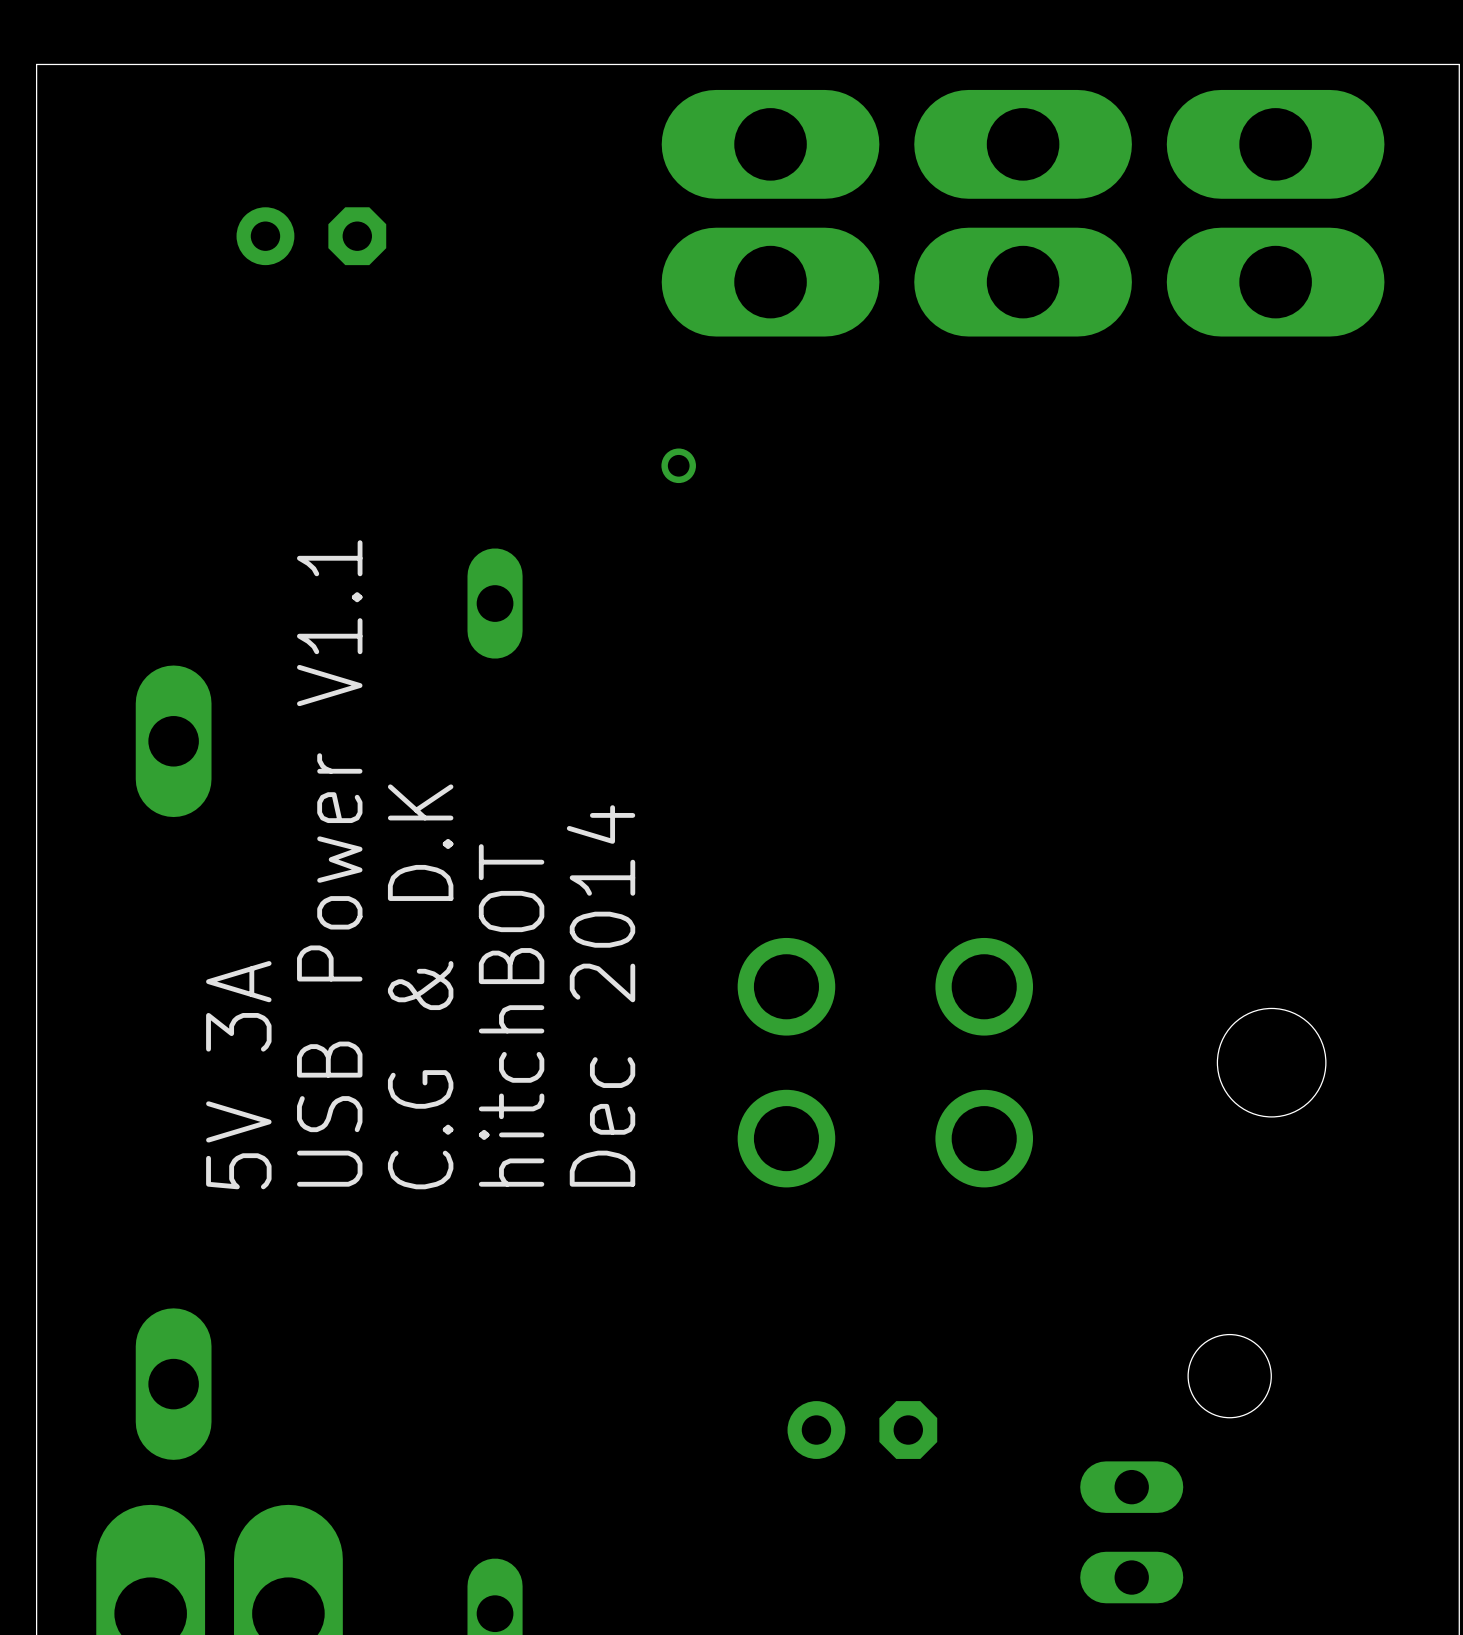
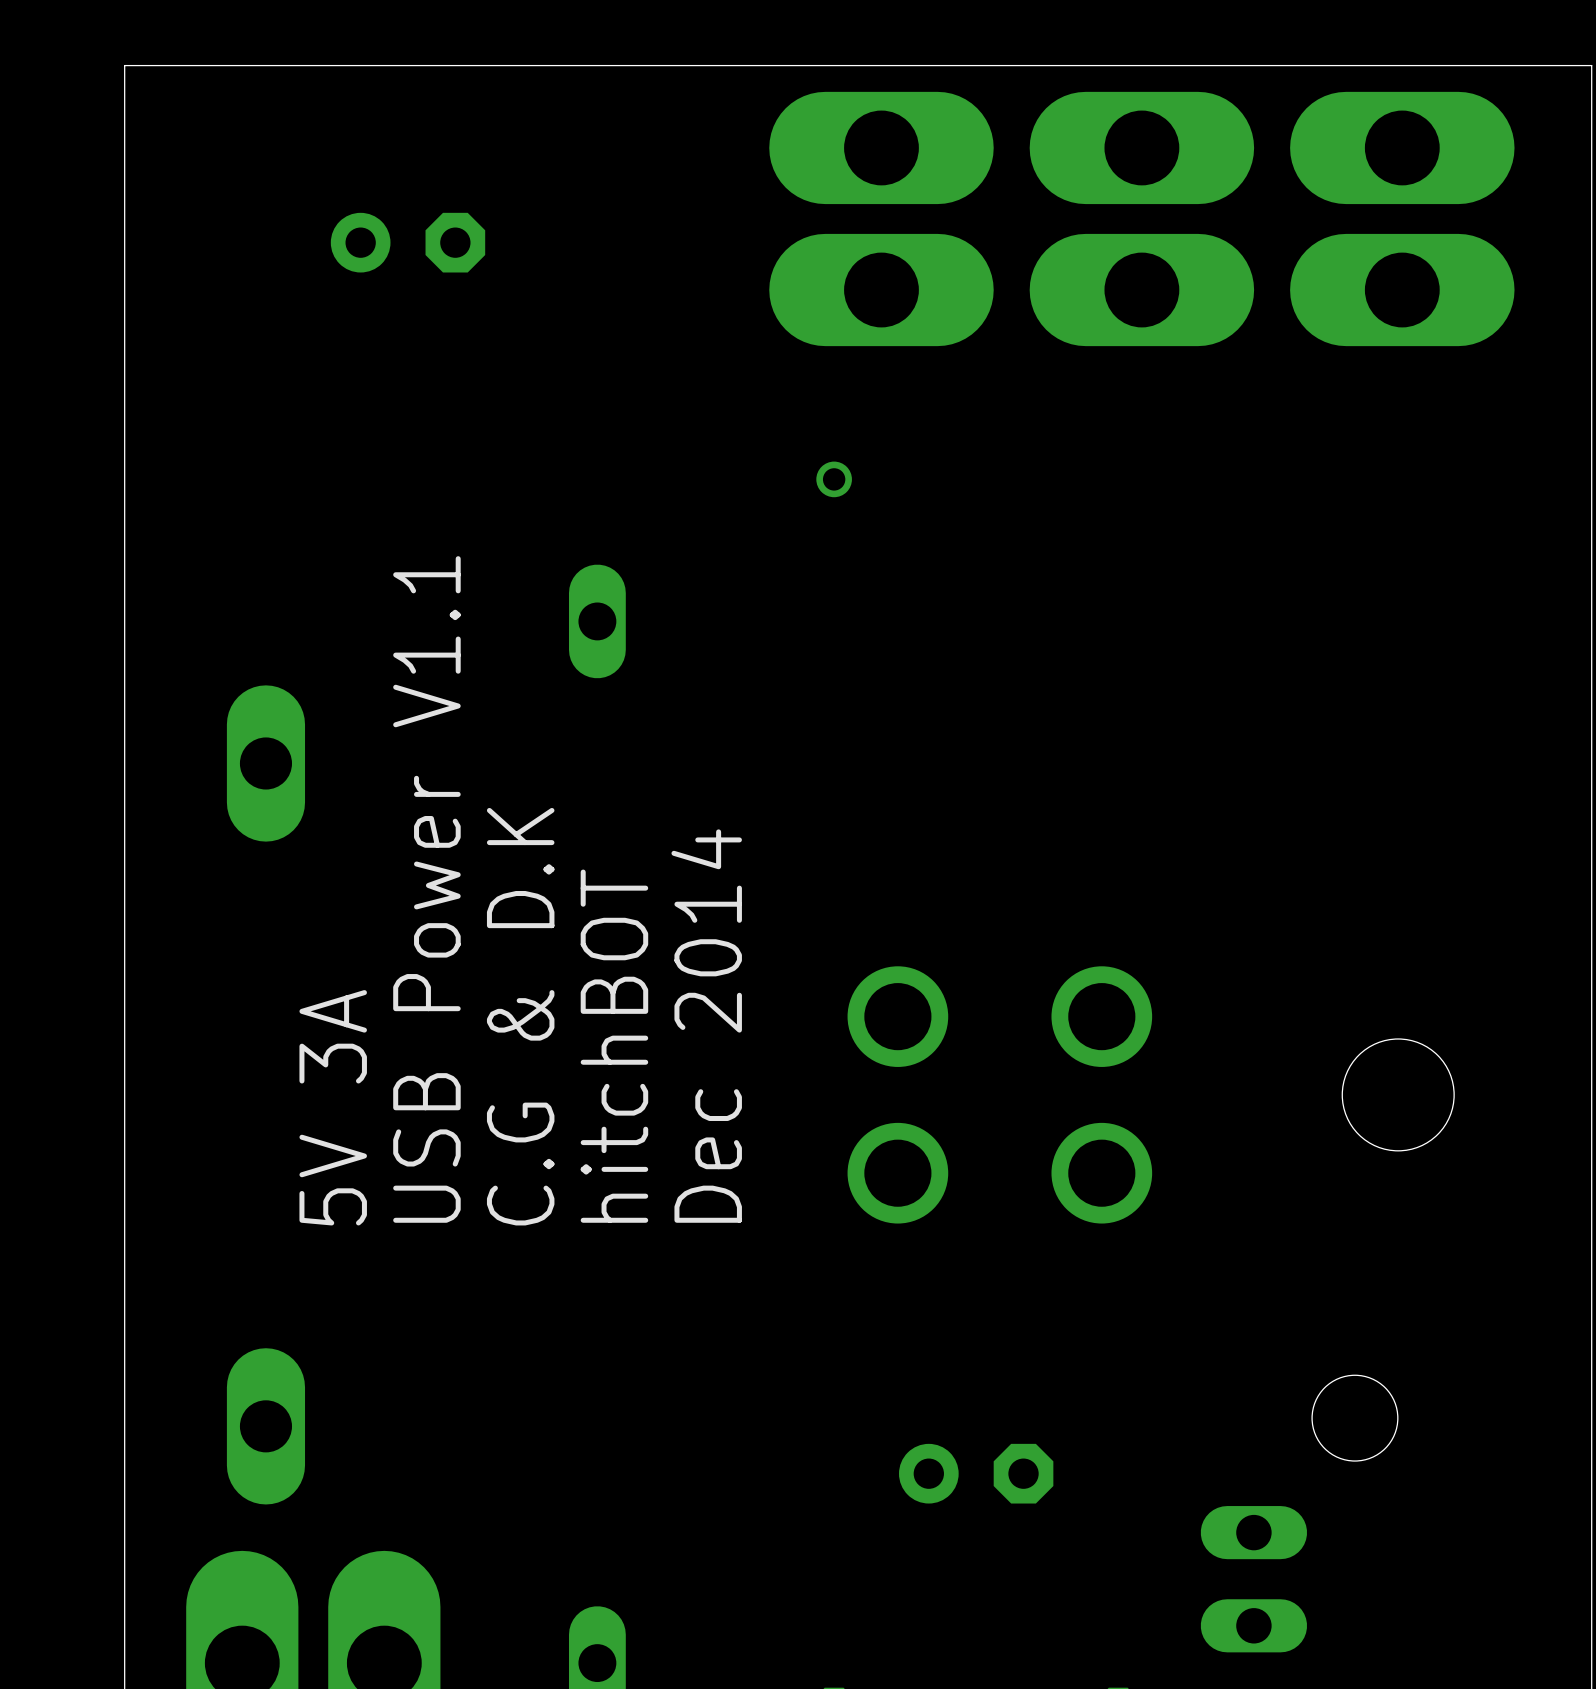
via position: (678, 465) -> (834, 479)

